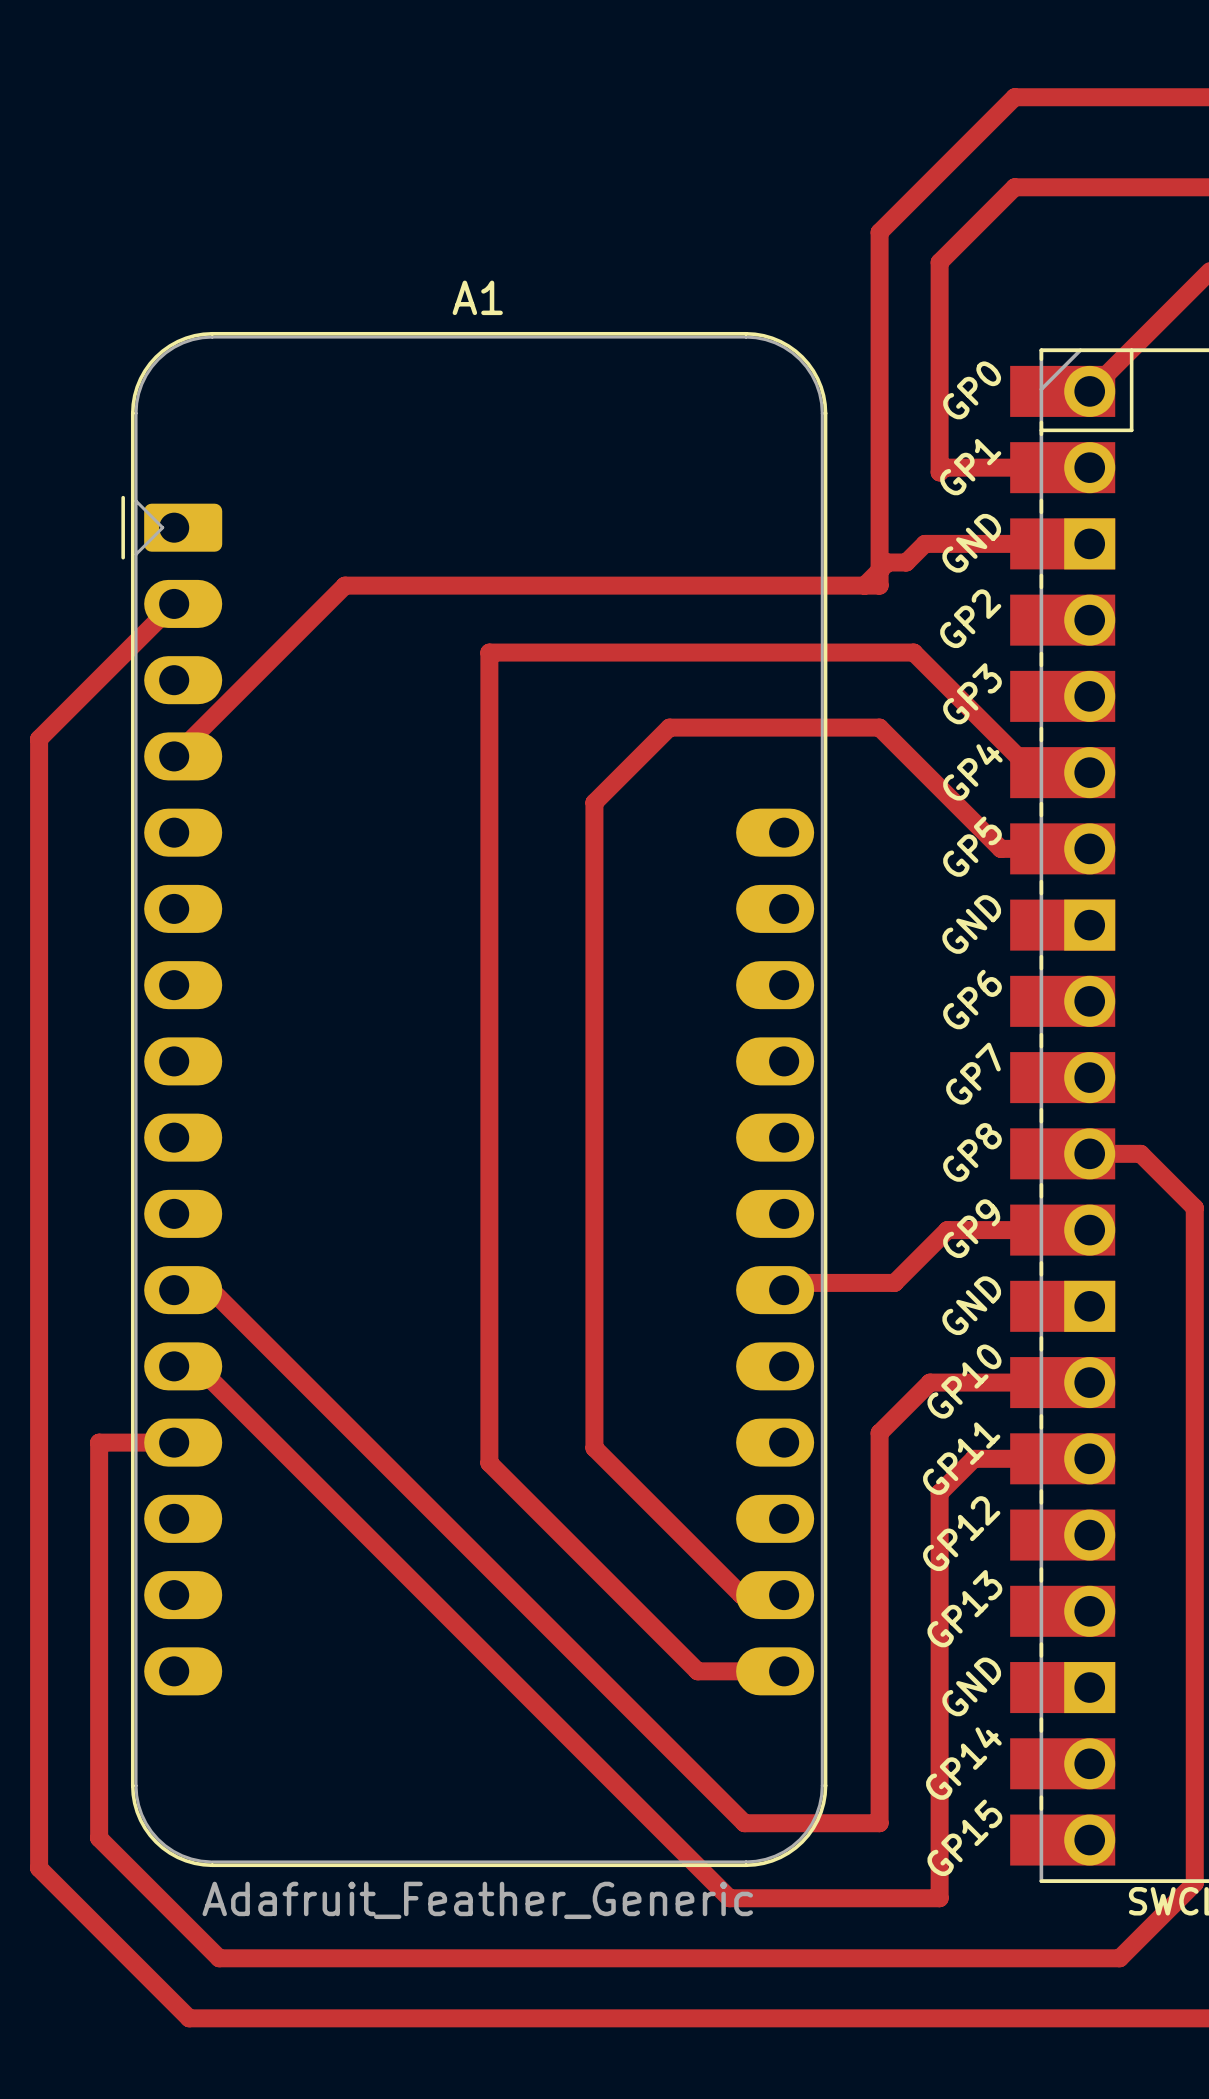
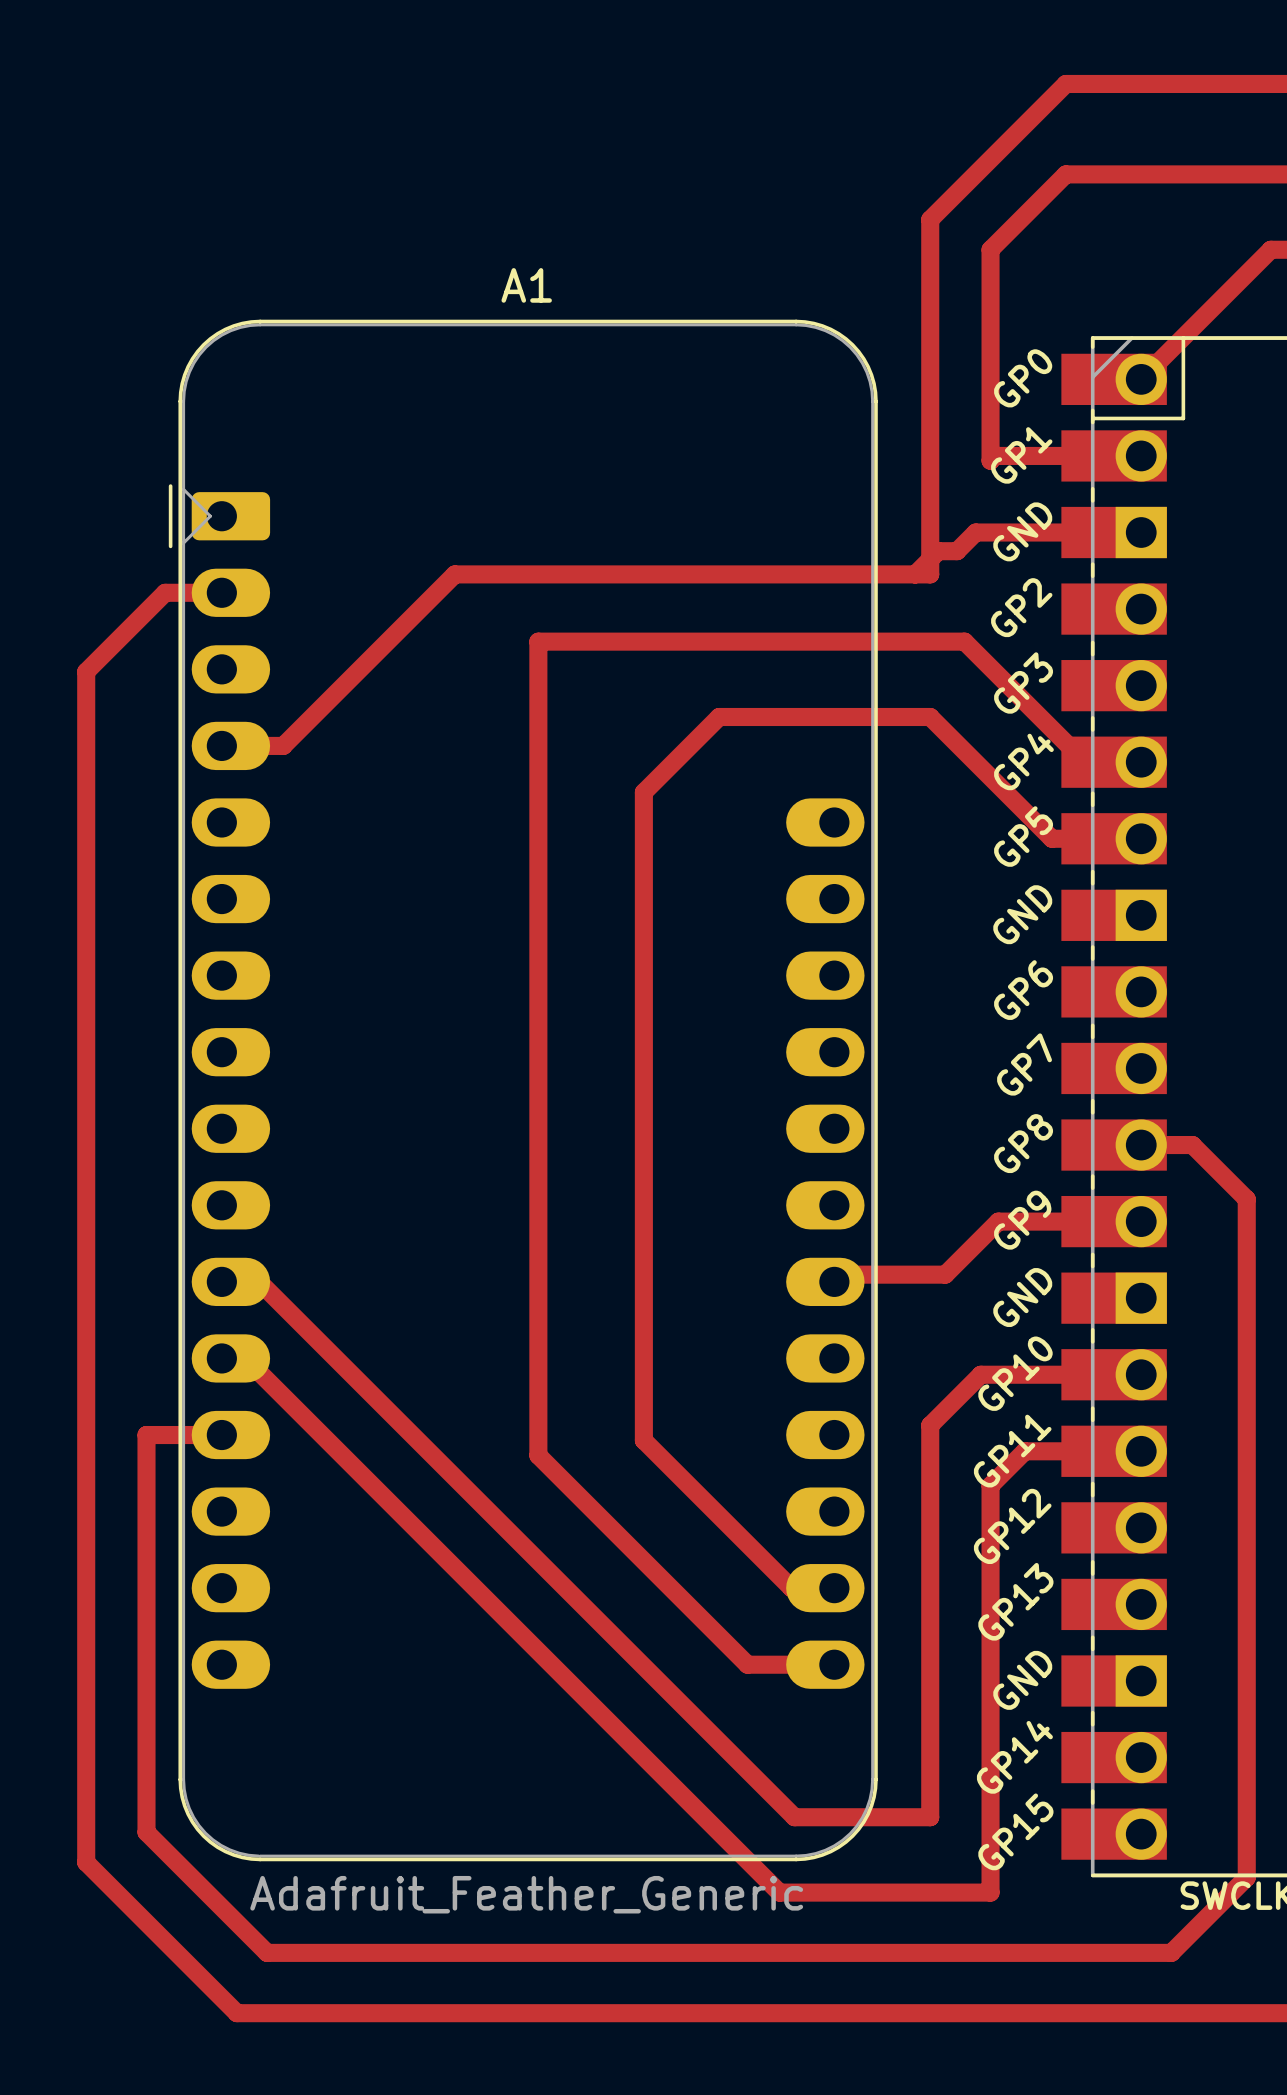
track: (406, 585) (344, 585) (174, 756) -> (454, 574) (283, 745) (221, 745)
track: (174, 603) (39, 739) -> (221, 592) (165, 592) (86, 671) (86, 728)

